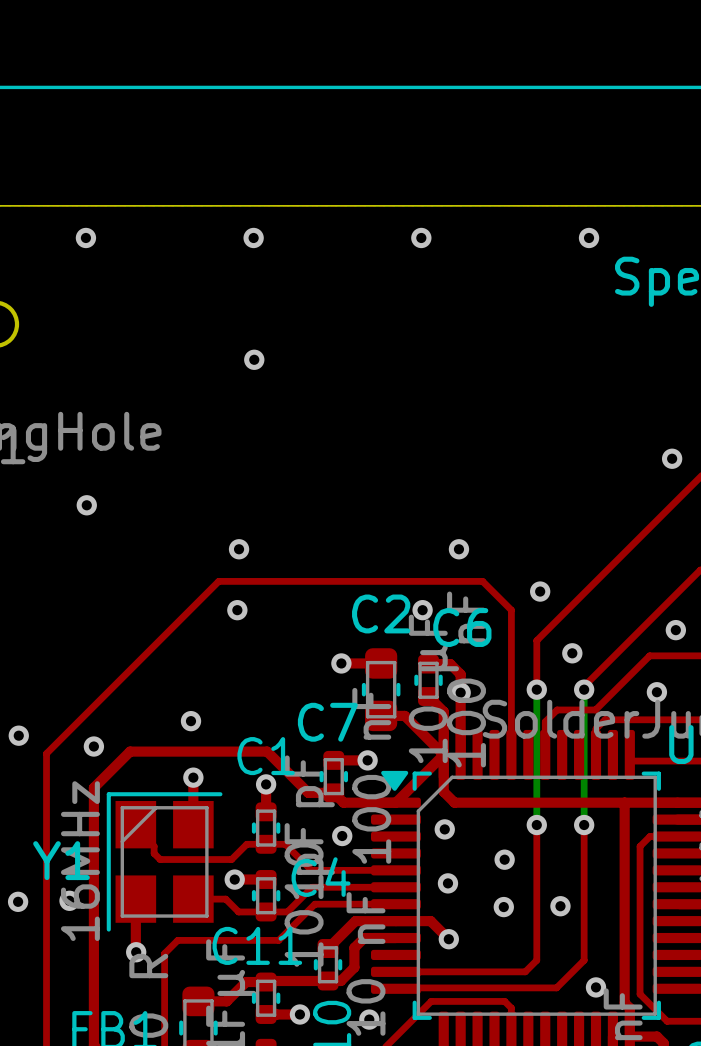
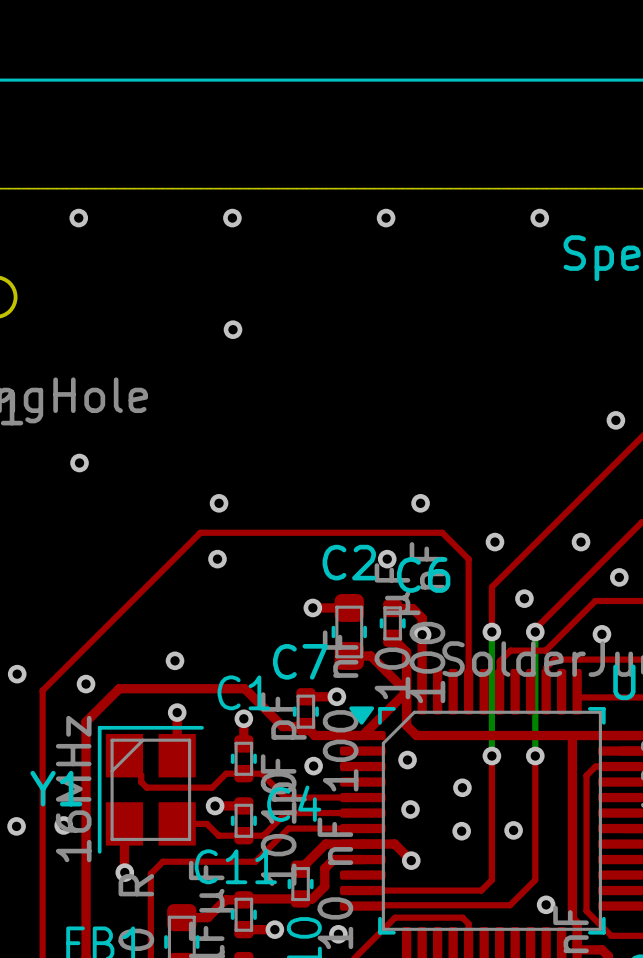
via: none -> (581, 542)

